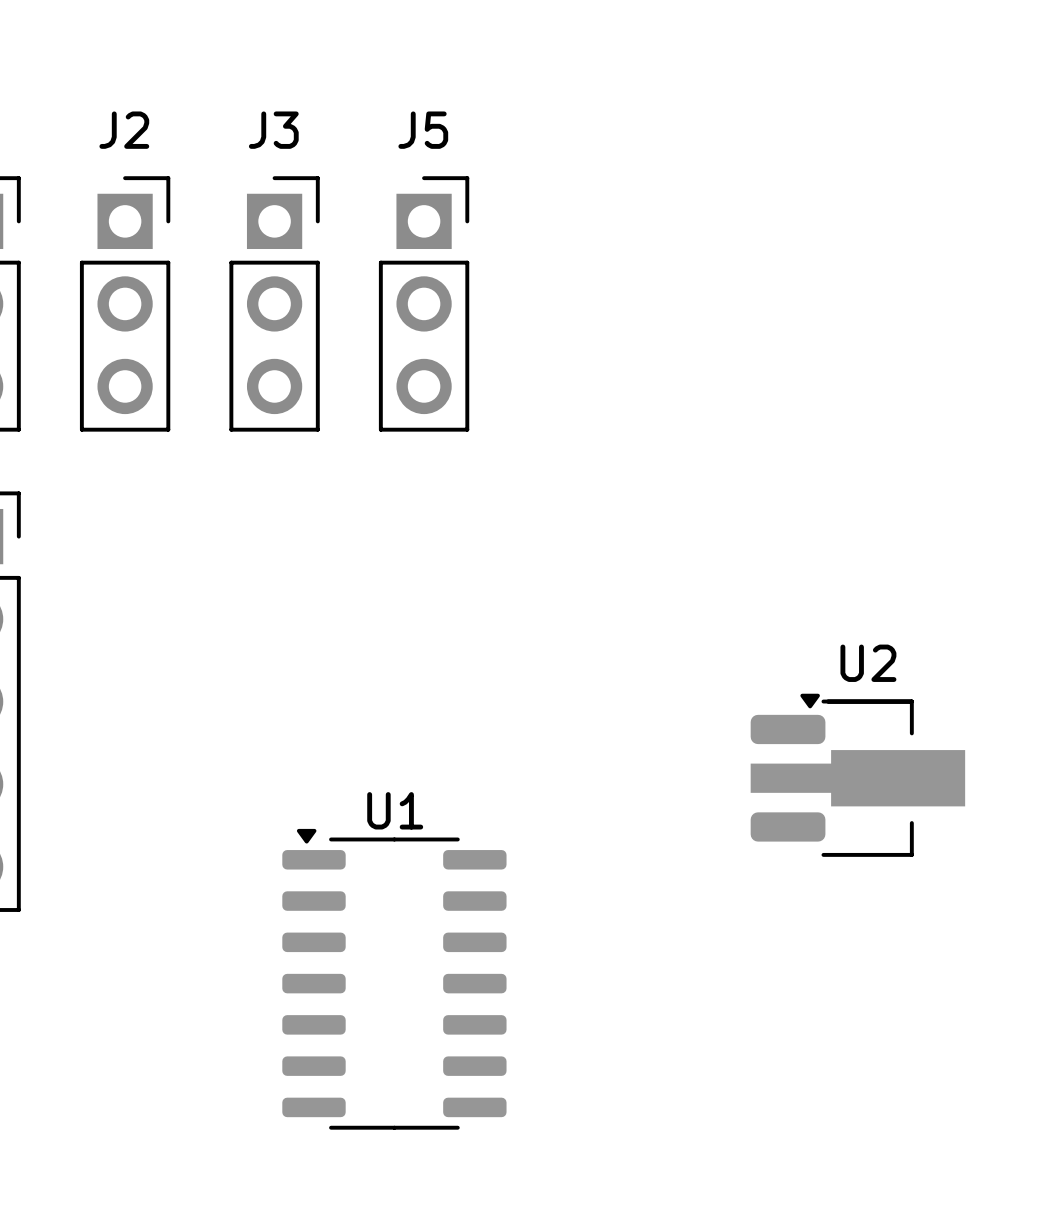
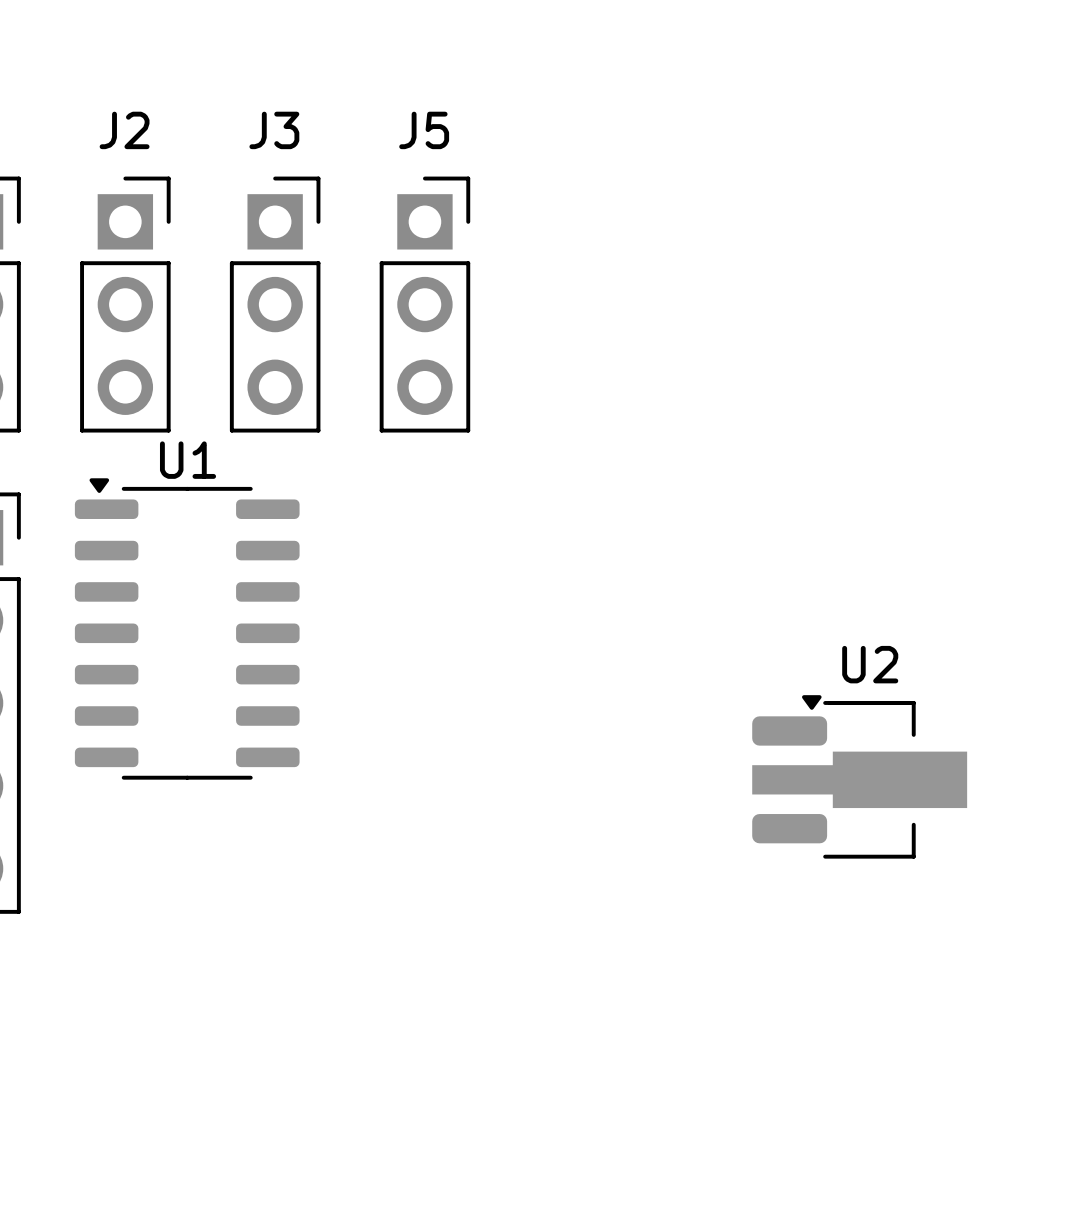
U1 position: (394, 979) -> (187, 628)

